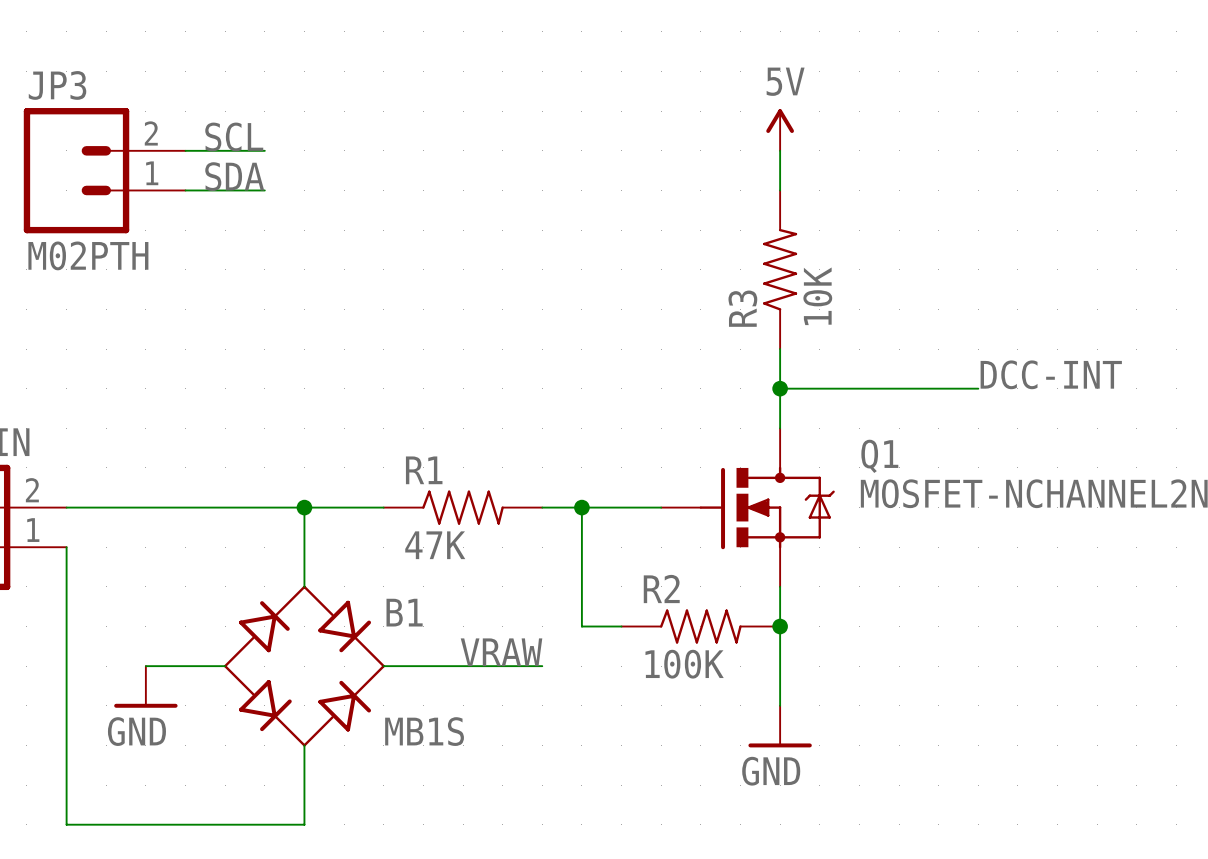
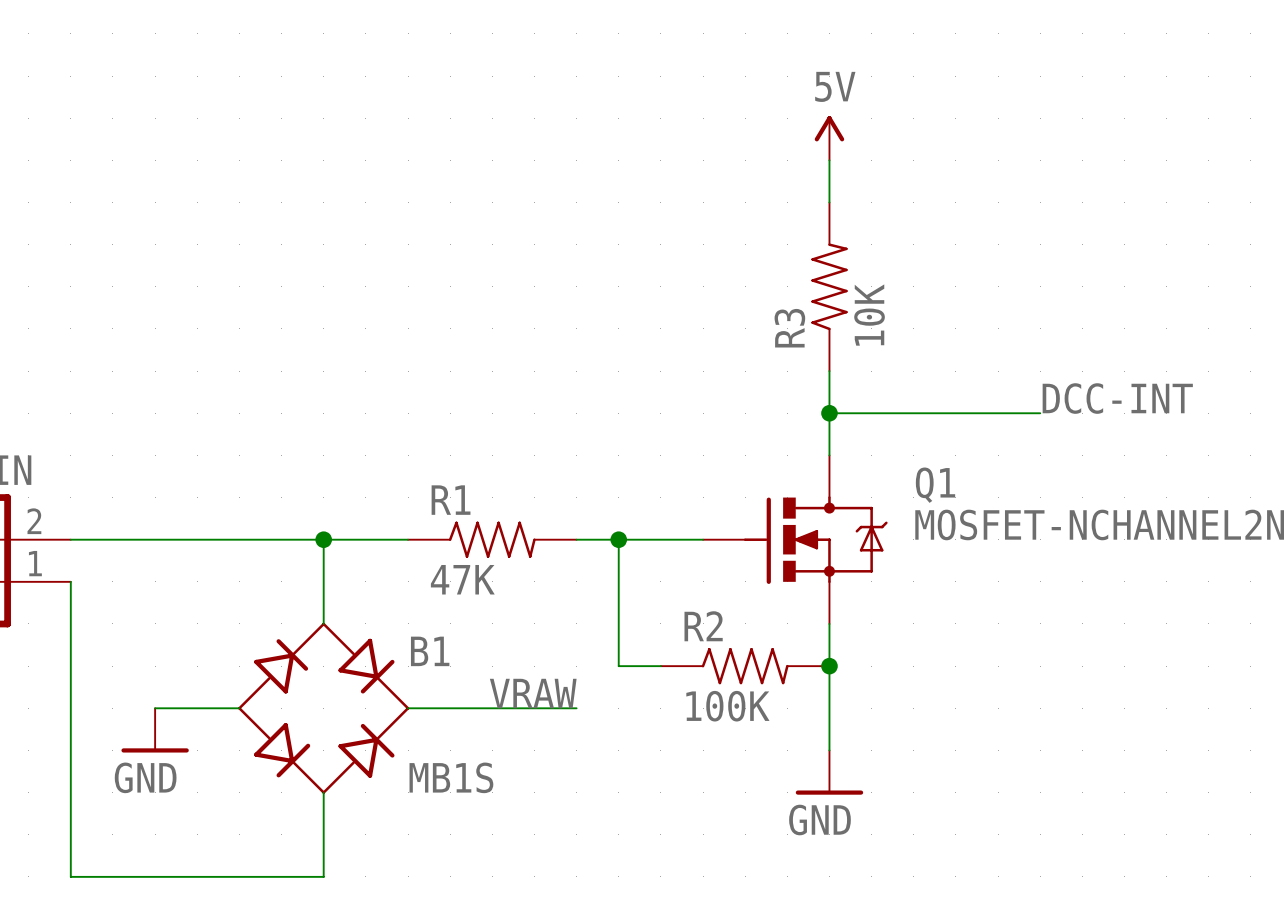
label: SCL (234, 136) -> none
wire: (185, 150) (264, 150) -> none
JP3: M02PTH (104, 170) -> none
label: SDA (234, 176) -> none
wire: (185, 190) (264, 190) -> none

